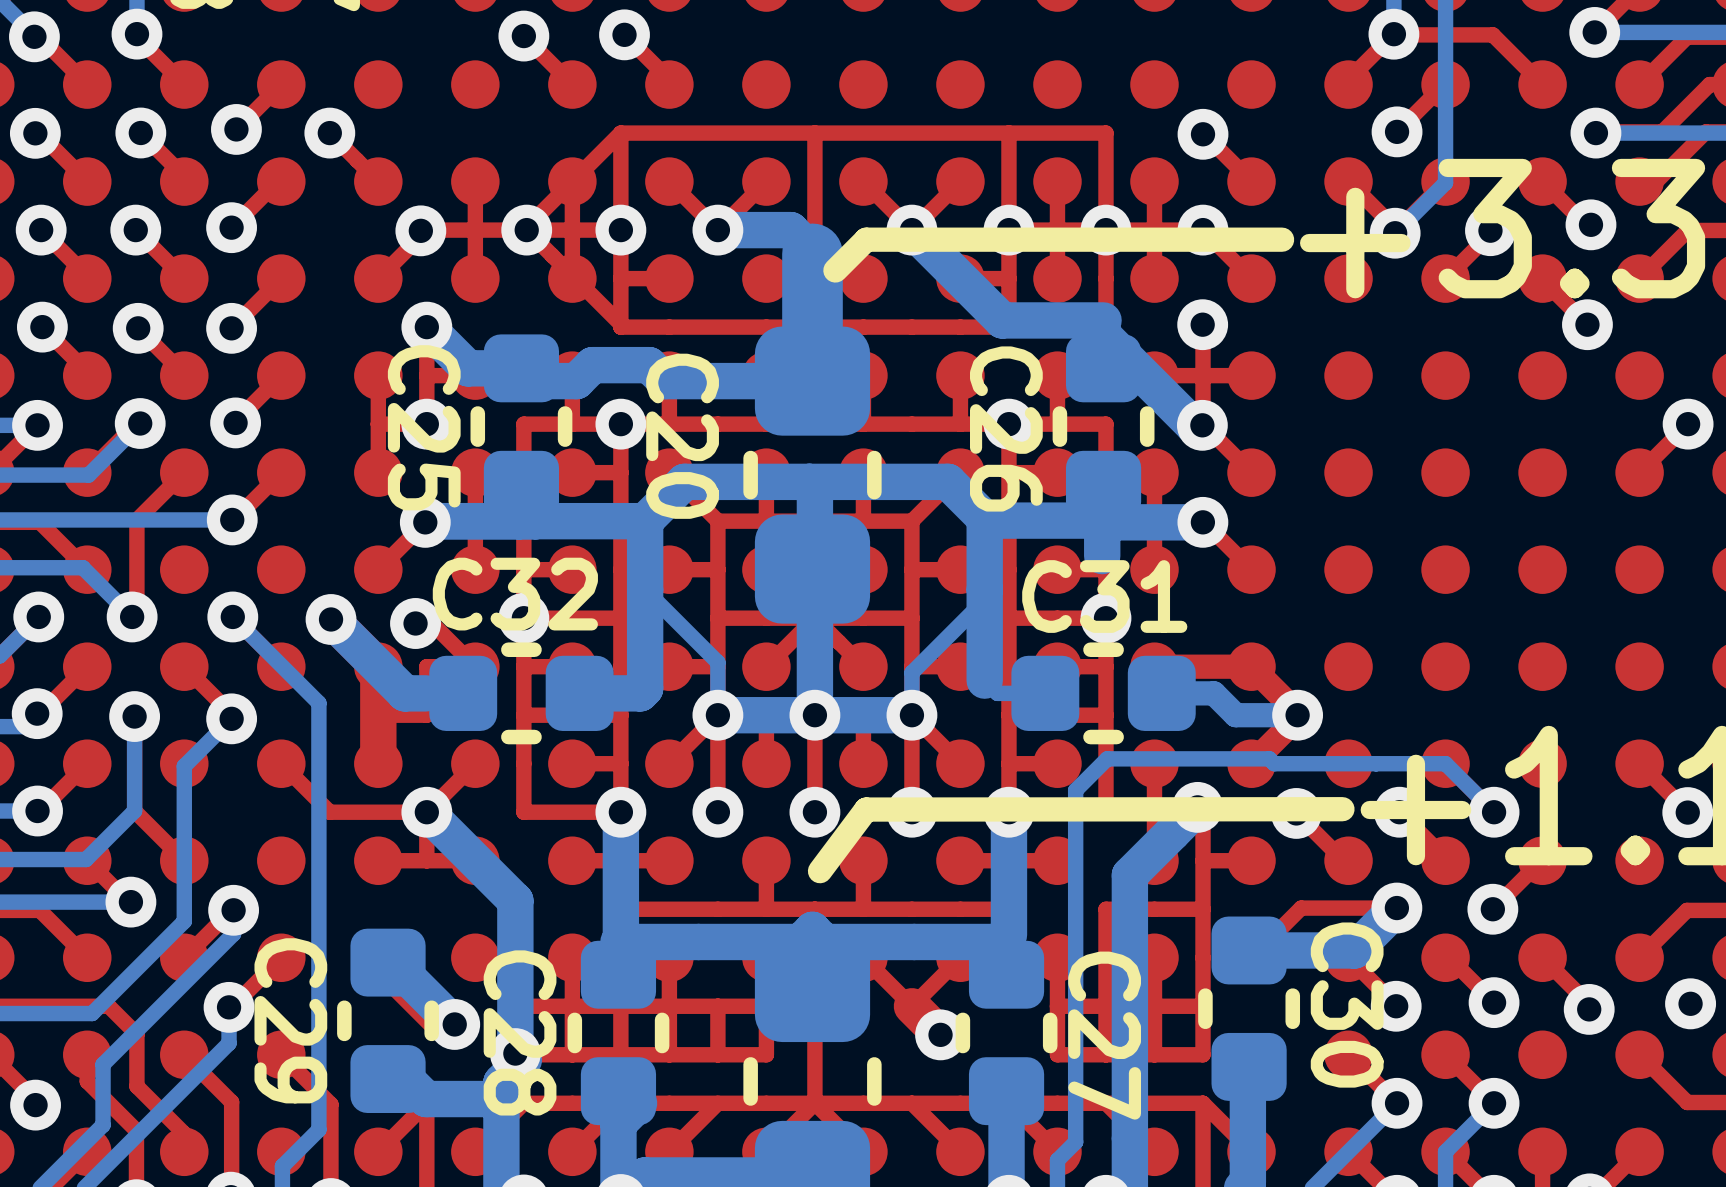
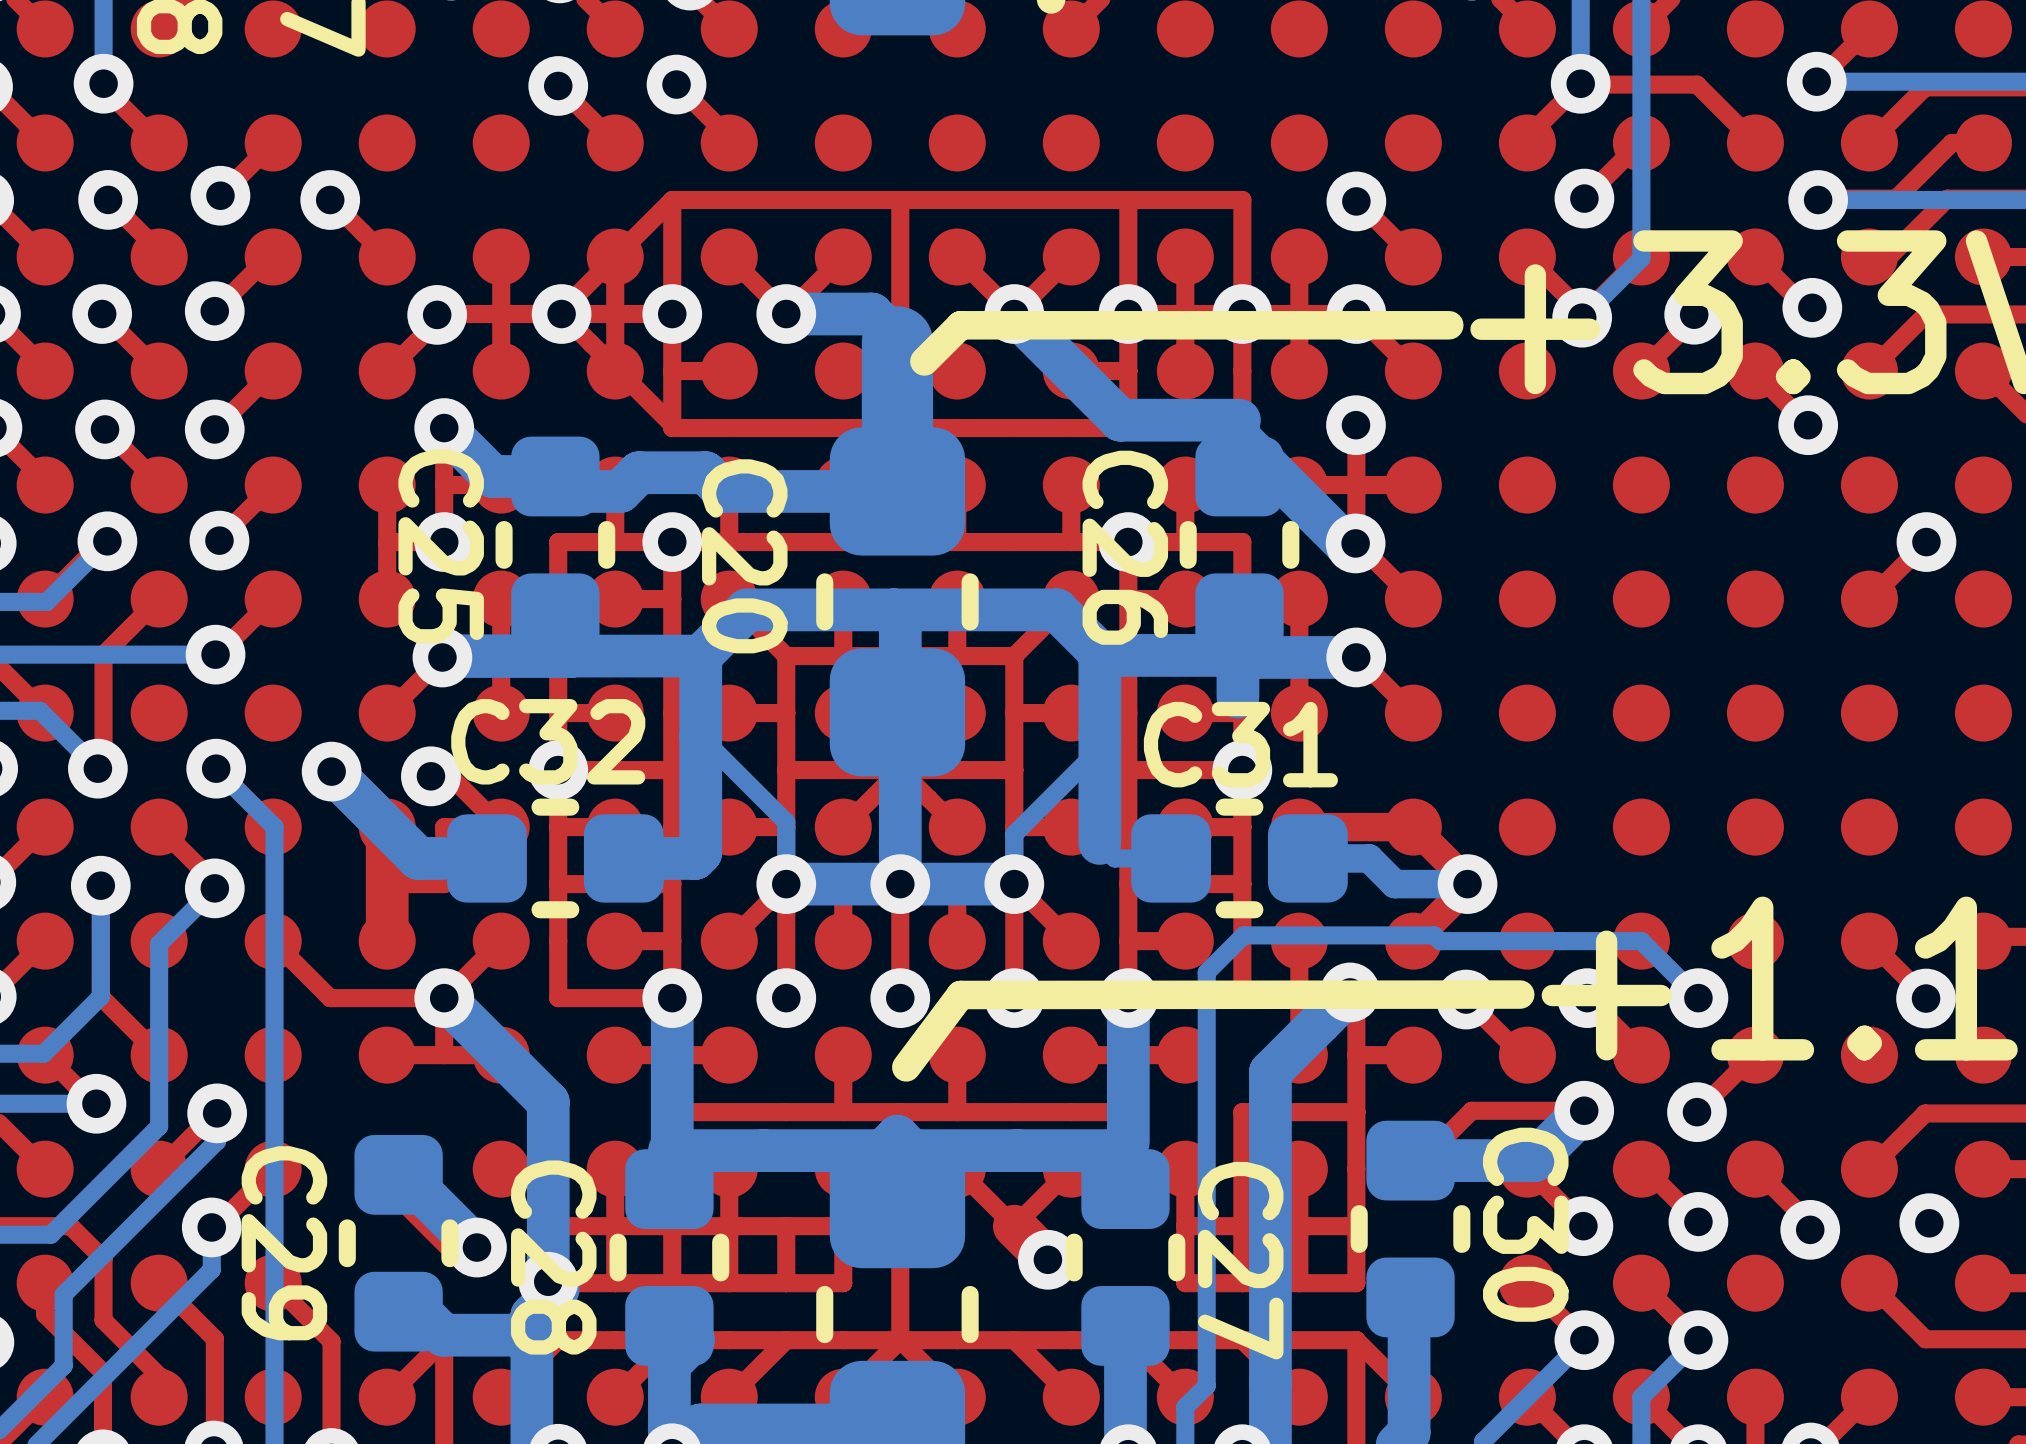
bottom track: (282, 666) (318, 703) (318, 1129) (282, 1166) -> (274, 827) (274, 1414)

